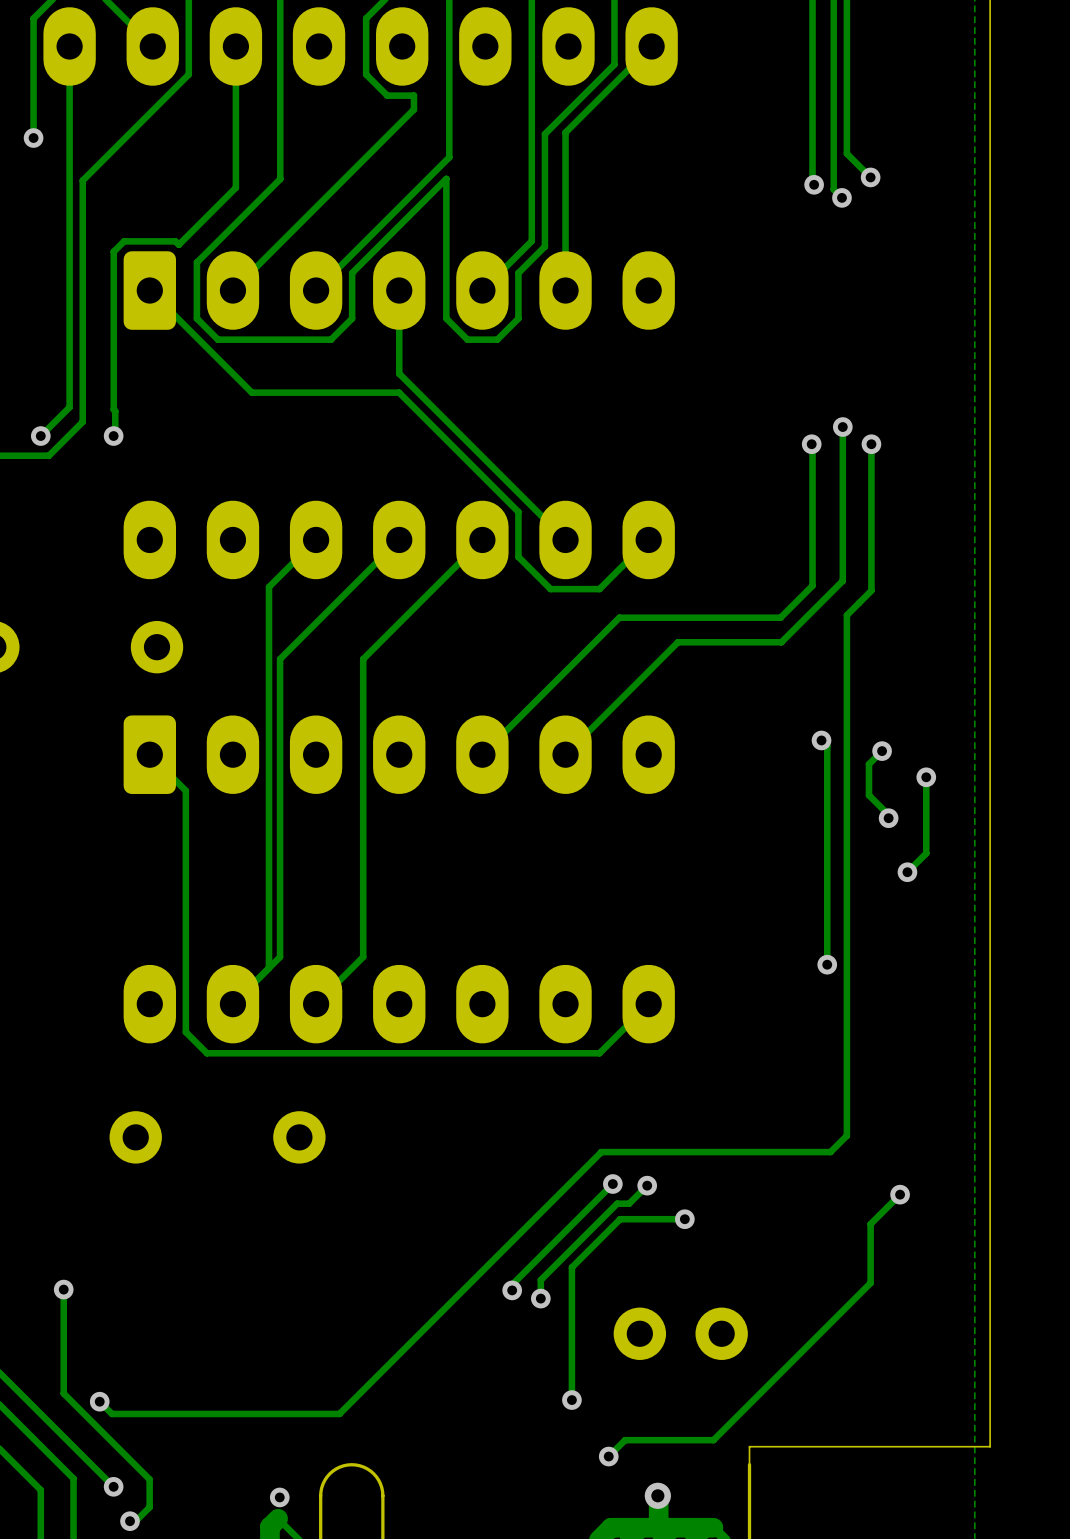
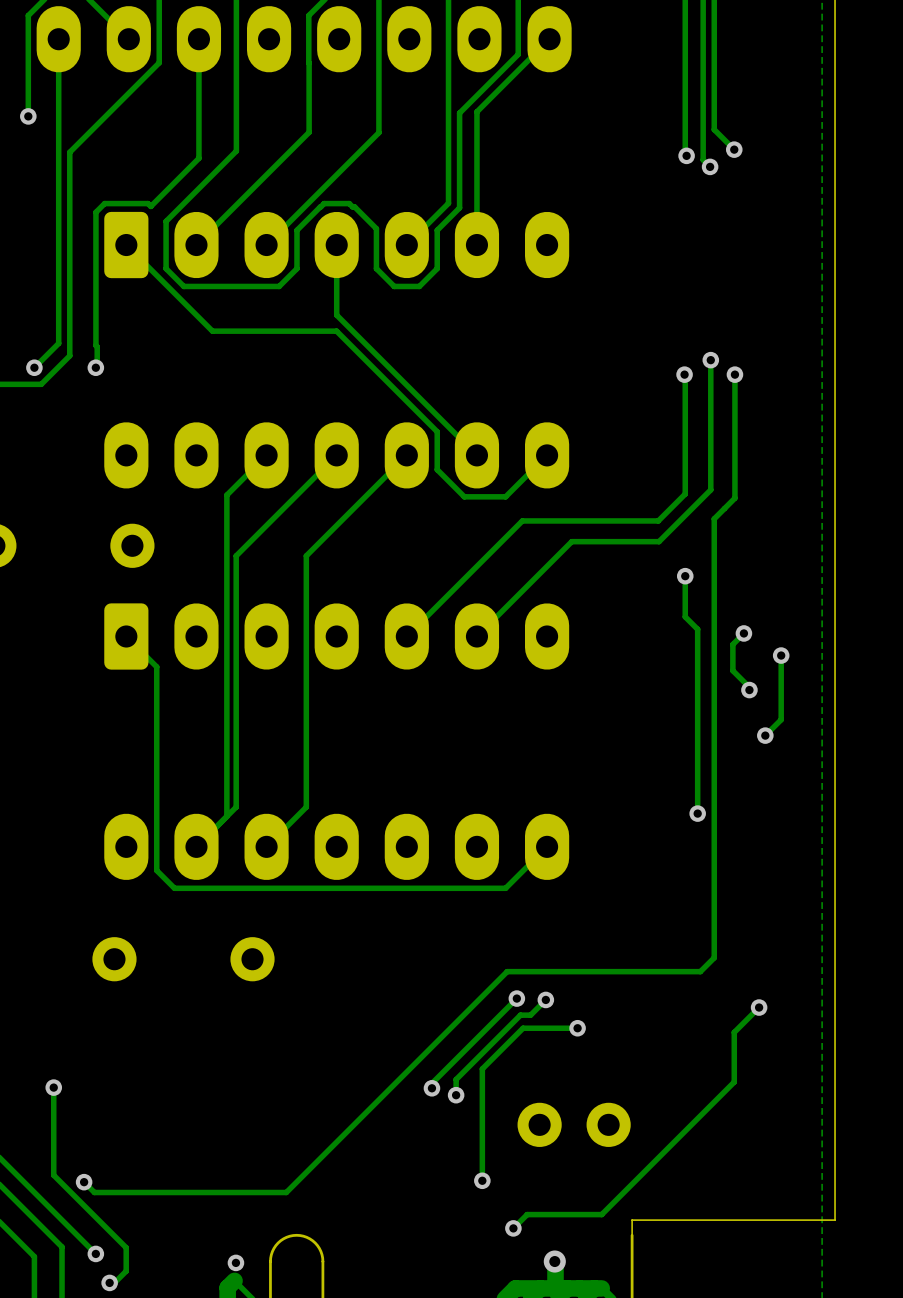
track: (366, 74) (387, 95) (413, 95) (413, 109) (366, 156) -> (309, 63) (309, 132)
track: (379, 245) (446, 178) (446, 271) -> (320, 206) (324, 203) (349, 203) (376, 228)
track: none -> (685, 576) (685, 616) (692, 624)
via position: (821, 740) -> (685, 576)

